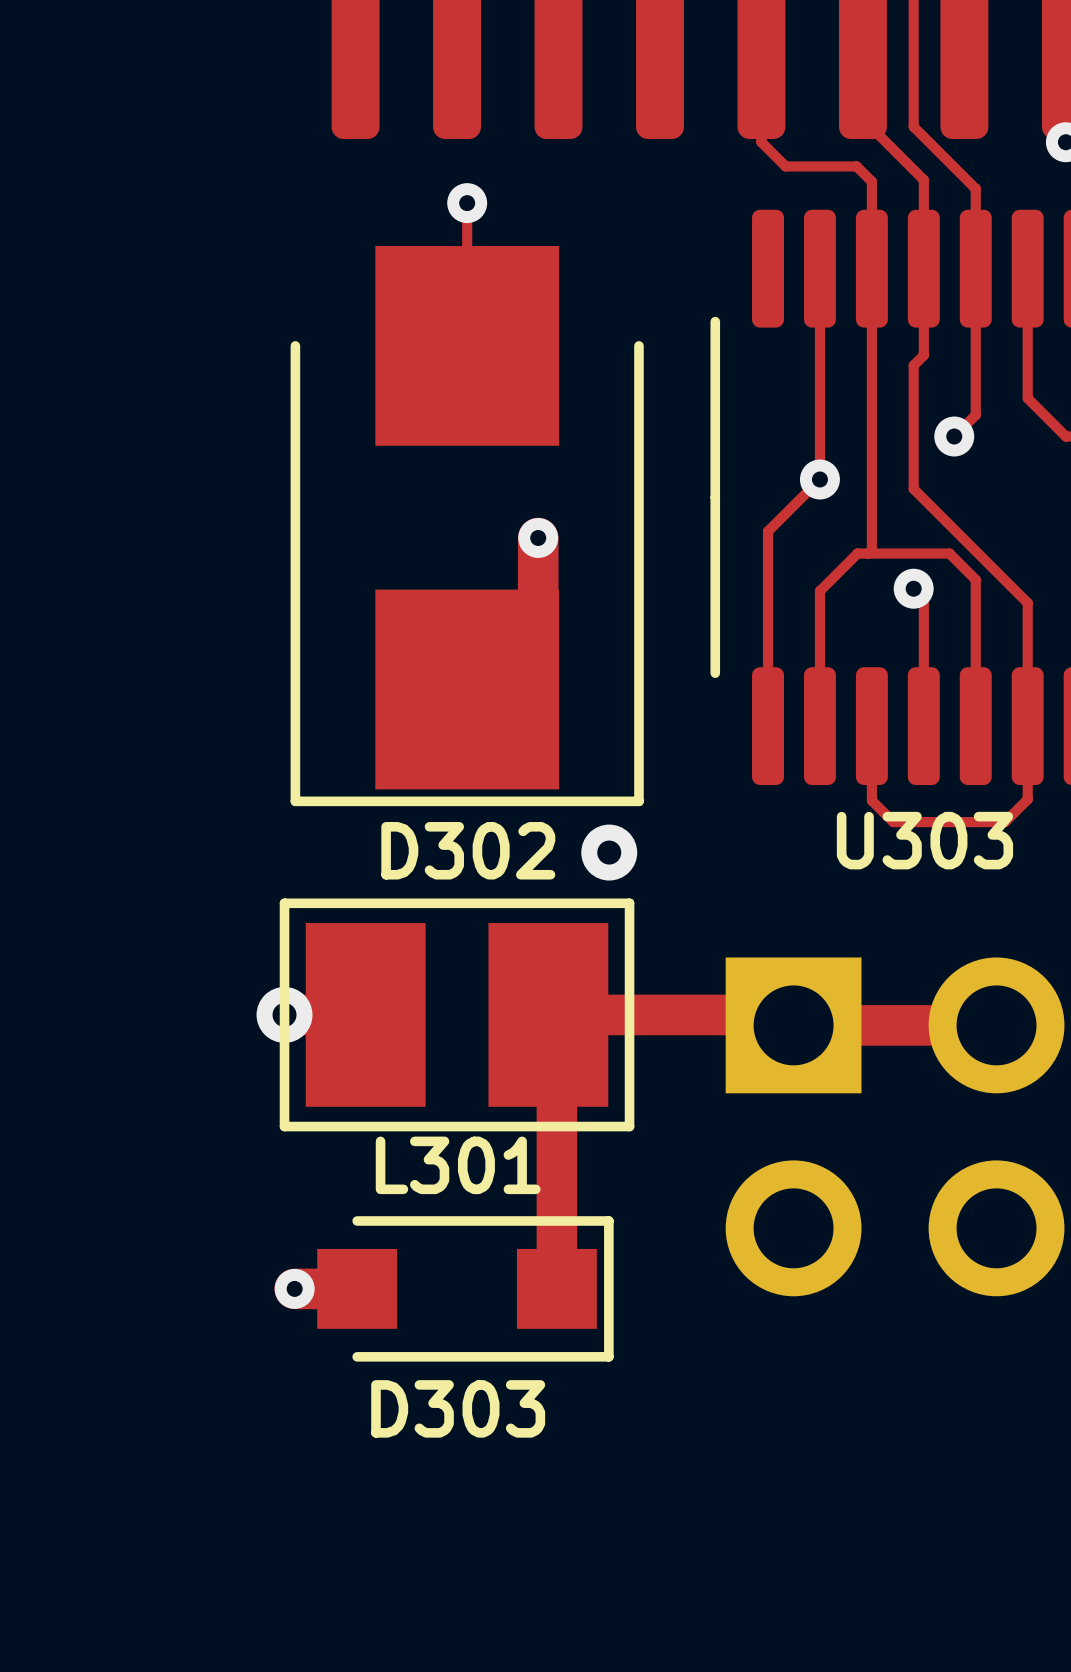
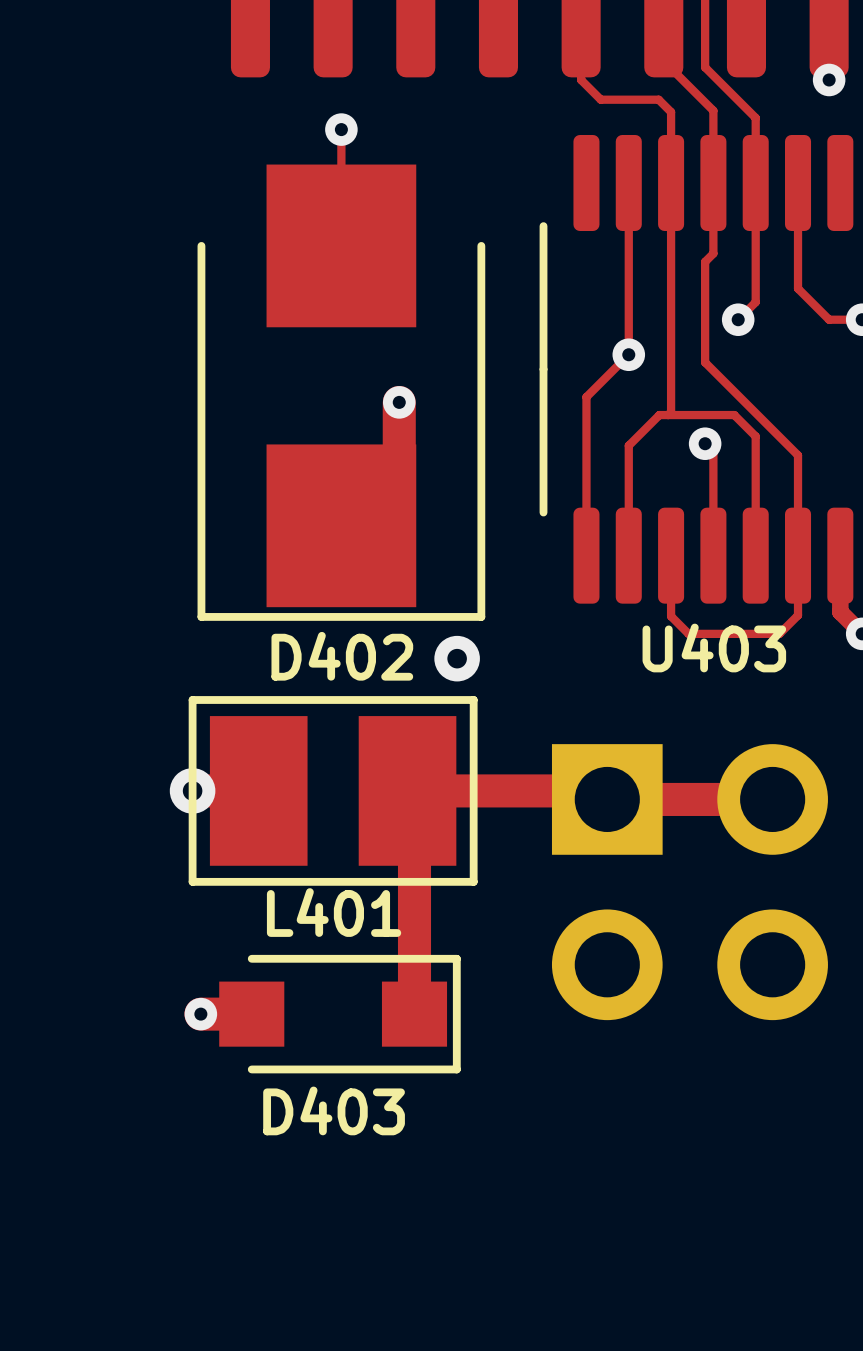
U303 name: U303 (924, 840) -> U403 (714, 648)
D302 name: D302 (468, 850) -> D402 (342, 656)
L301 name: L301 (458, 1165) -> L401 (334, 912)
D303 name: D303 (458, 1408) -> D403 (334, 1110)

